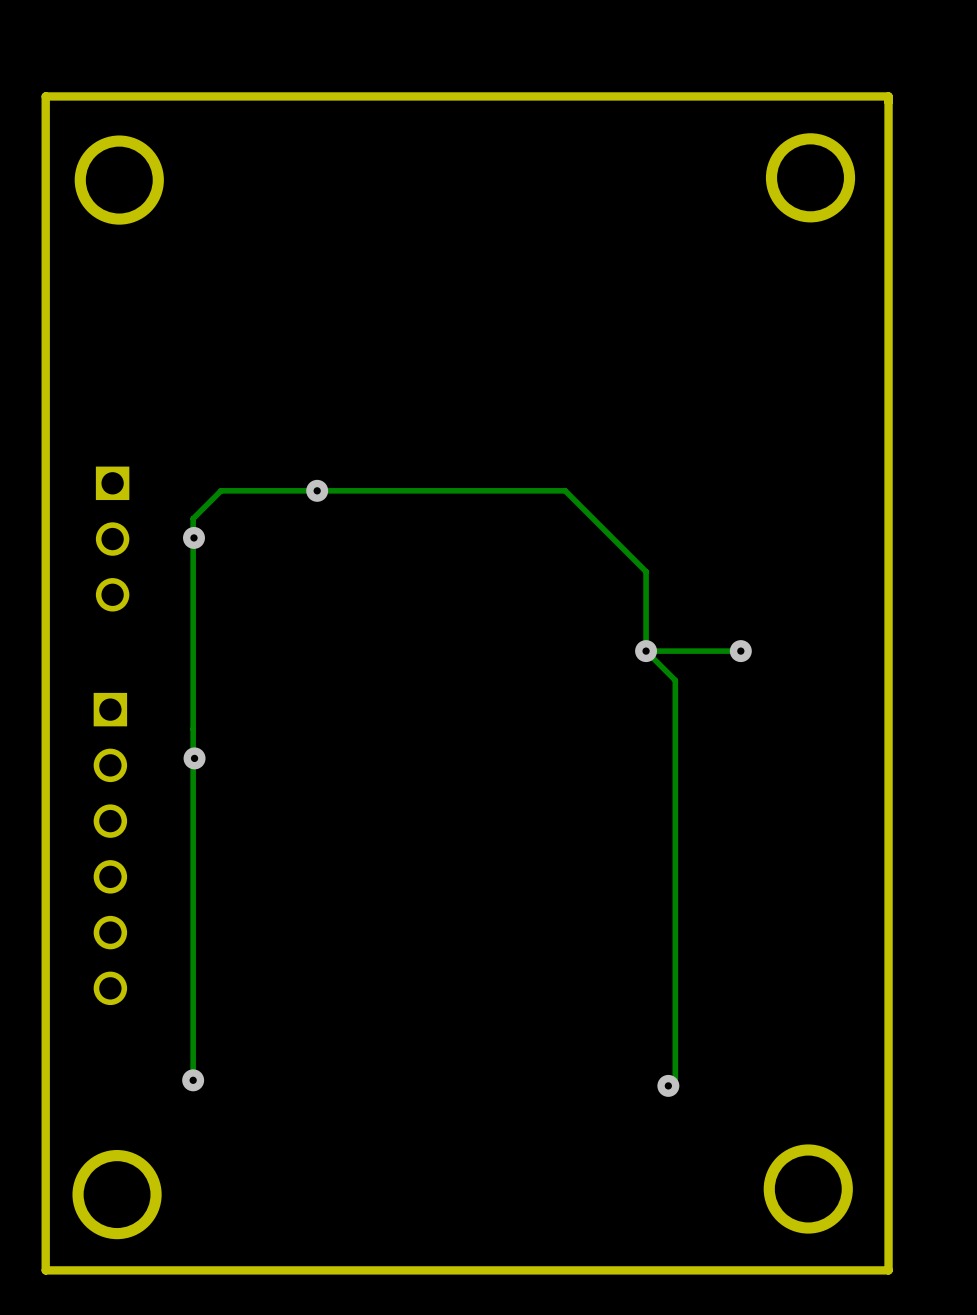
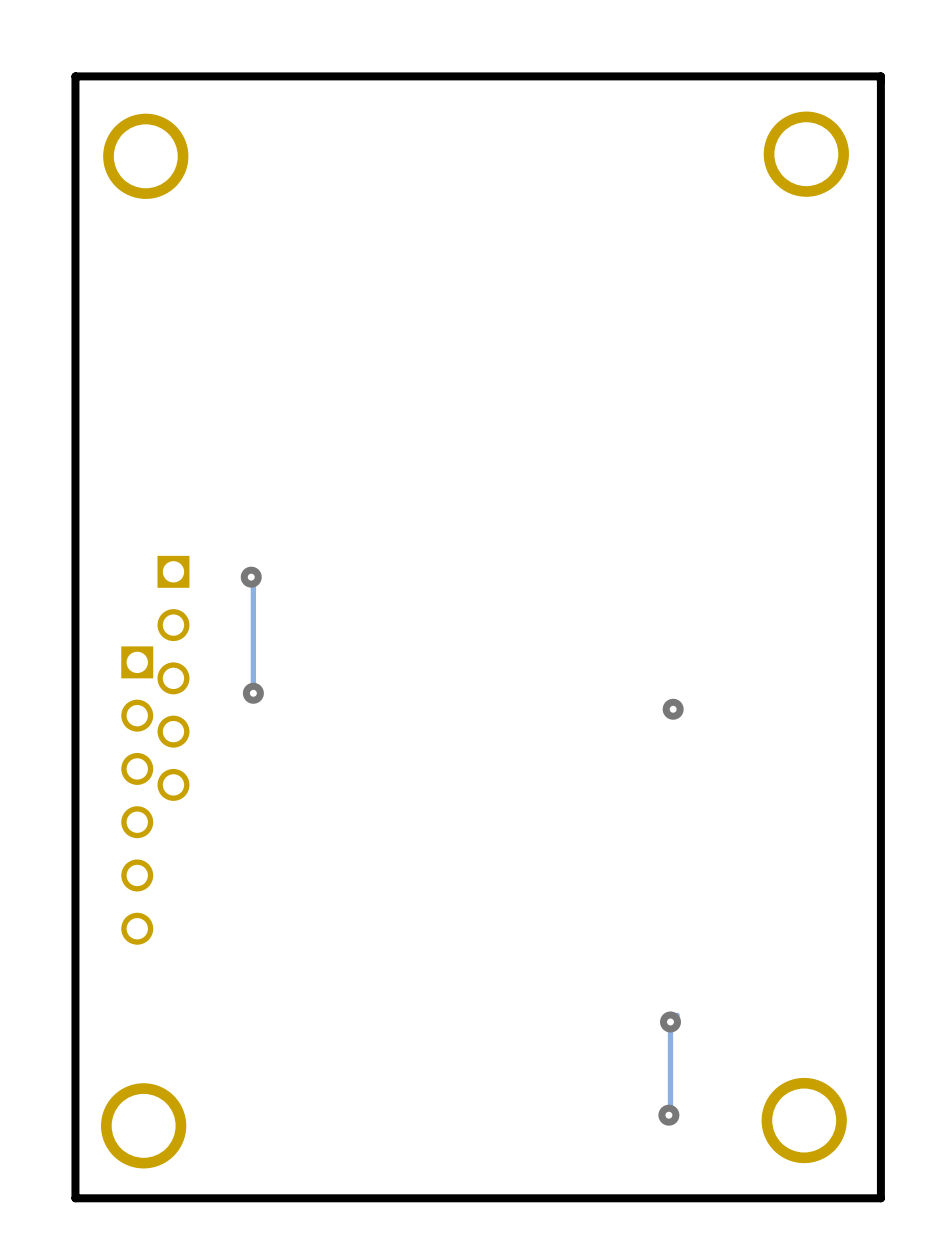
via: (317, 490) -> none
via: (193, 537) -> none
part: (112, 539) -> none
track: none -> (251, 577) (253, 579) (253, 693)
via: none -> (251, 577)
track: (646, 651) (646, 571) (565, 490) (221, 490) (193, 518) (193, 1080) -> none
track: (646, 651) (675, 680) (675, 1078) -> none
via: (646, 651) -> none
track: (740, 651) (646, 651) -> none
via: (740, 651) -> none
part: none -> (173, 678)
via position: (194, 758) -> (253, 693)
via: none -> (673, 709)
via: (193, 1080) -> none
track: none -> (670, 1021) (670, 1113) (668, 1115)
via: none -> (668, 1115)

